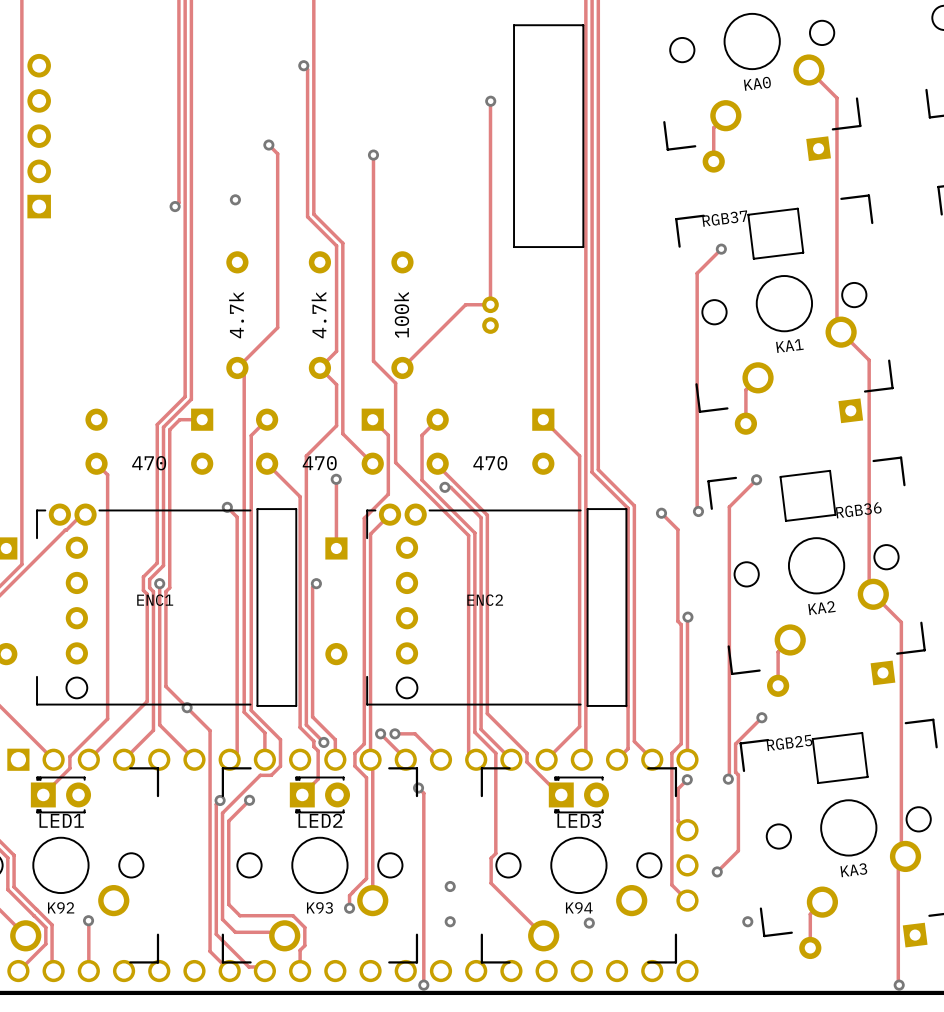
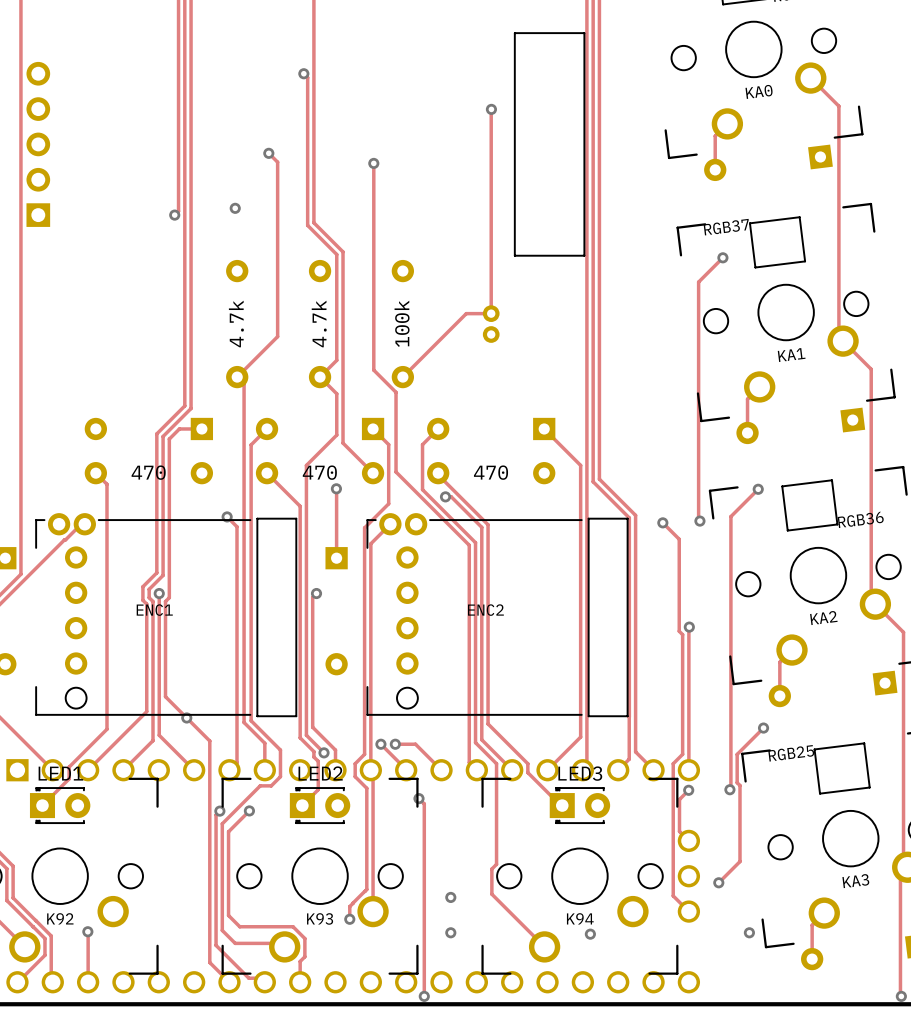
LED1 name position: LED1 (61, 820) -> LED1 (60, 773)
LED2 name position: LED2 (320, 820) -> LED2 (320, 773)
LED3 name position: LED3 (579, 820) -> LED3 (580, 773)

